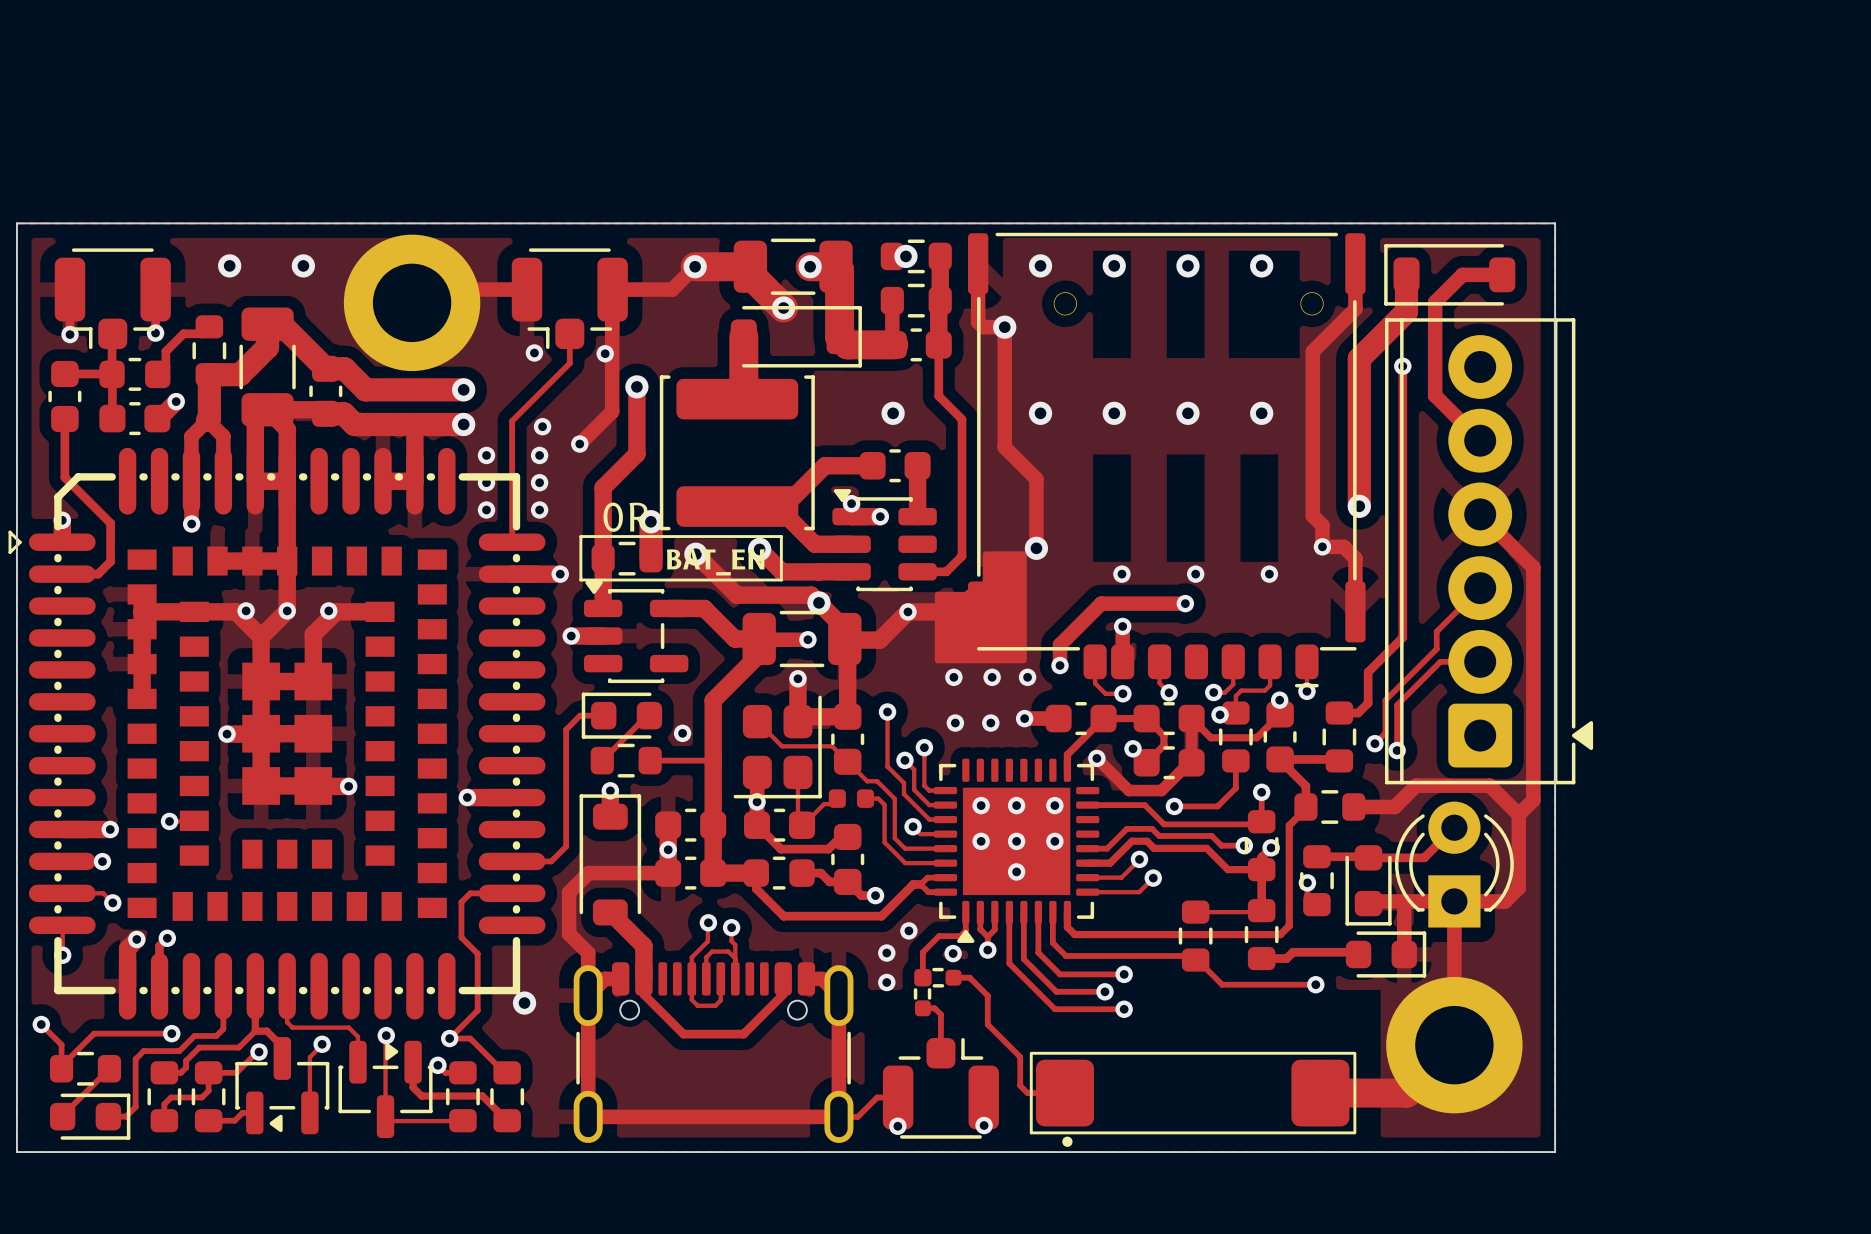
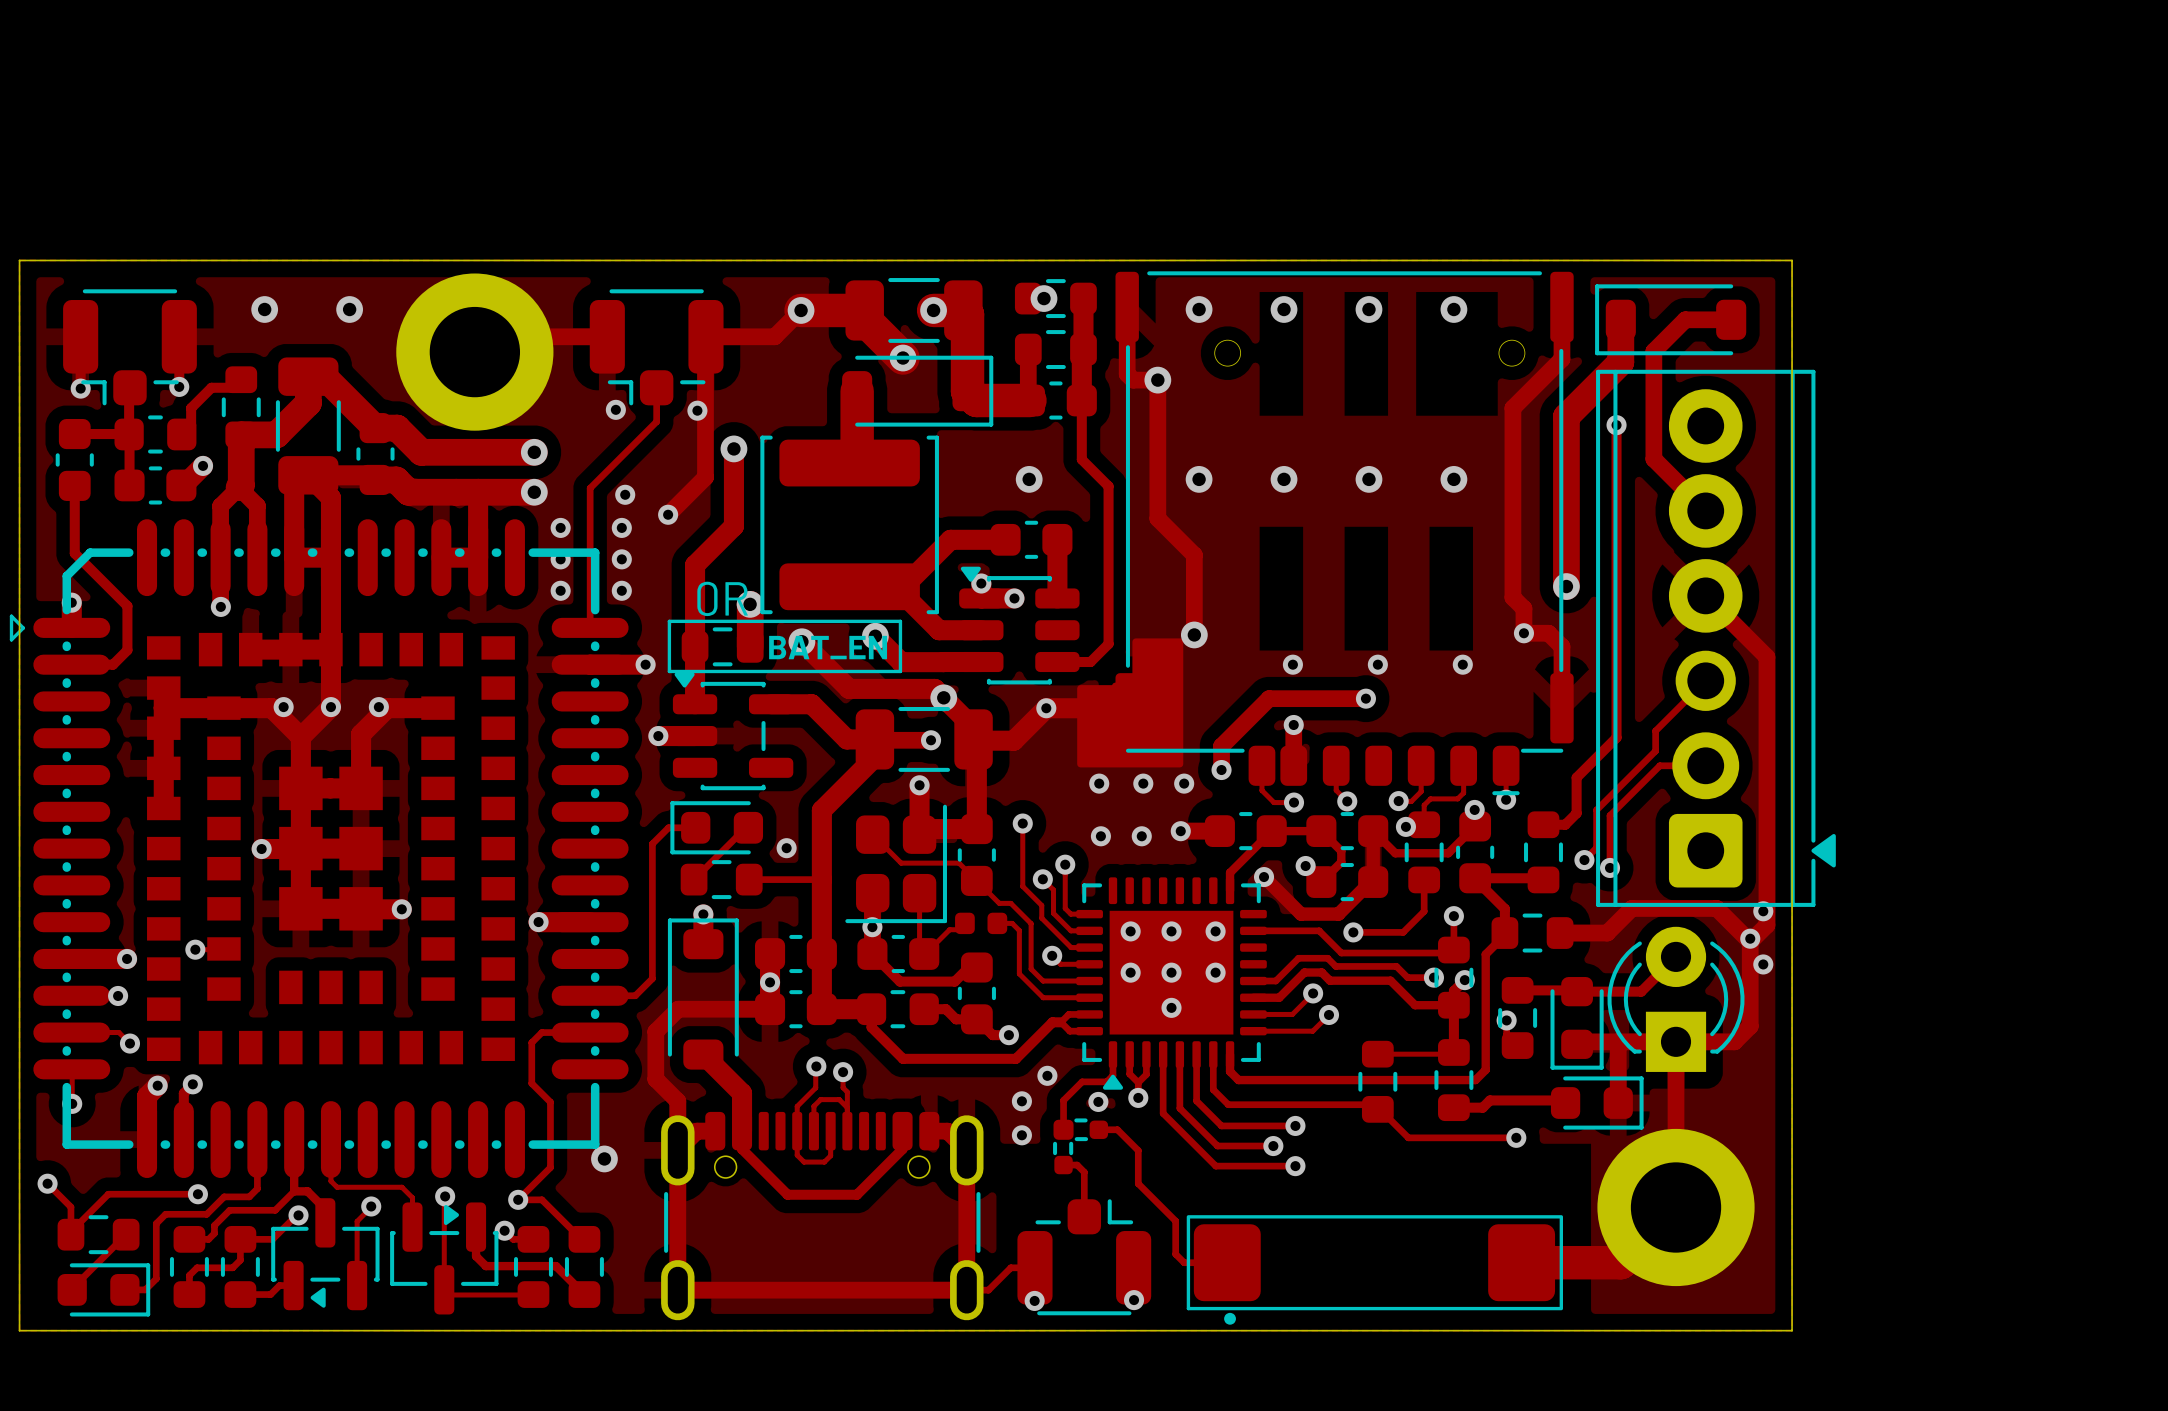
part footprint: [1385, 318, 1594, 785] -> [1596, 369, 1836, 907]
via: none -> (1763, 911)
via: none -> (1750, 938)
via: none -> (1763, 964)

